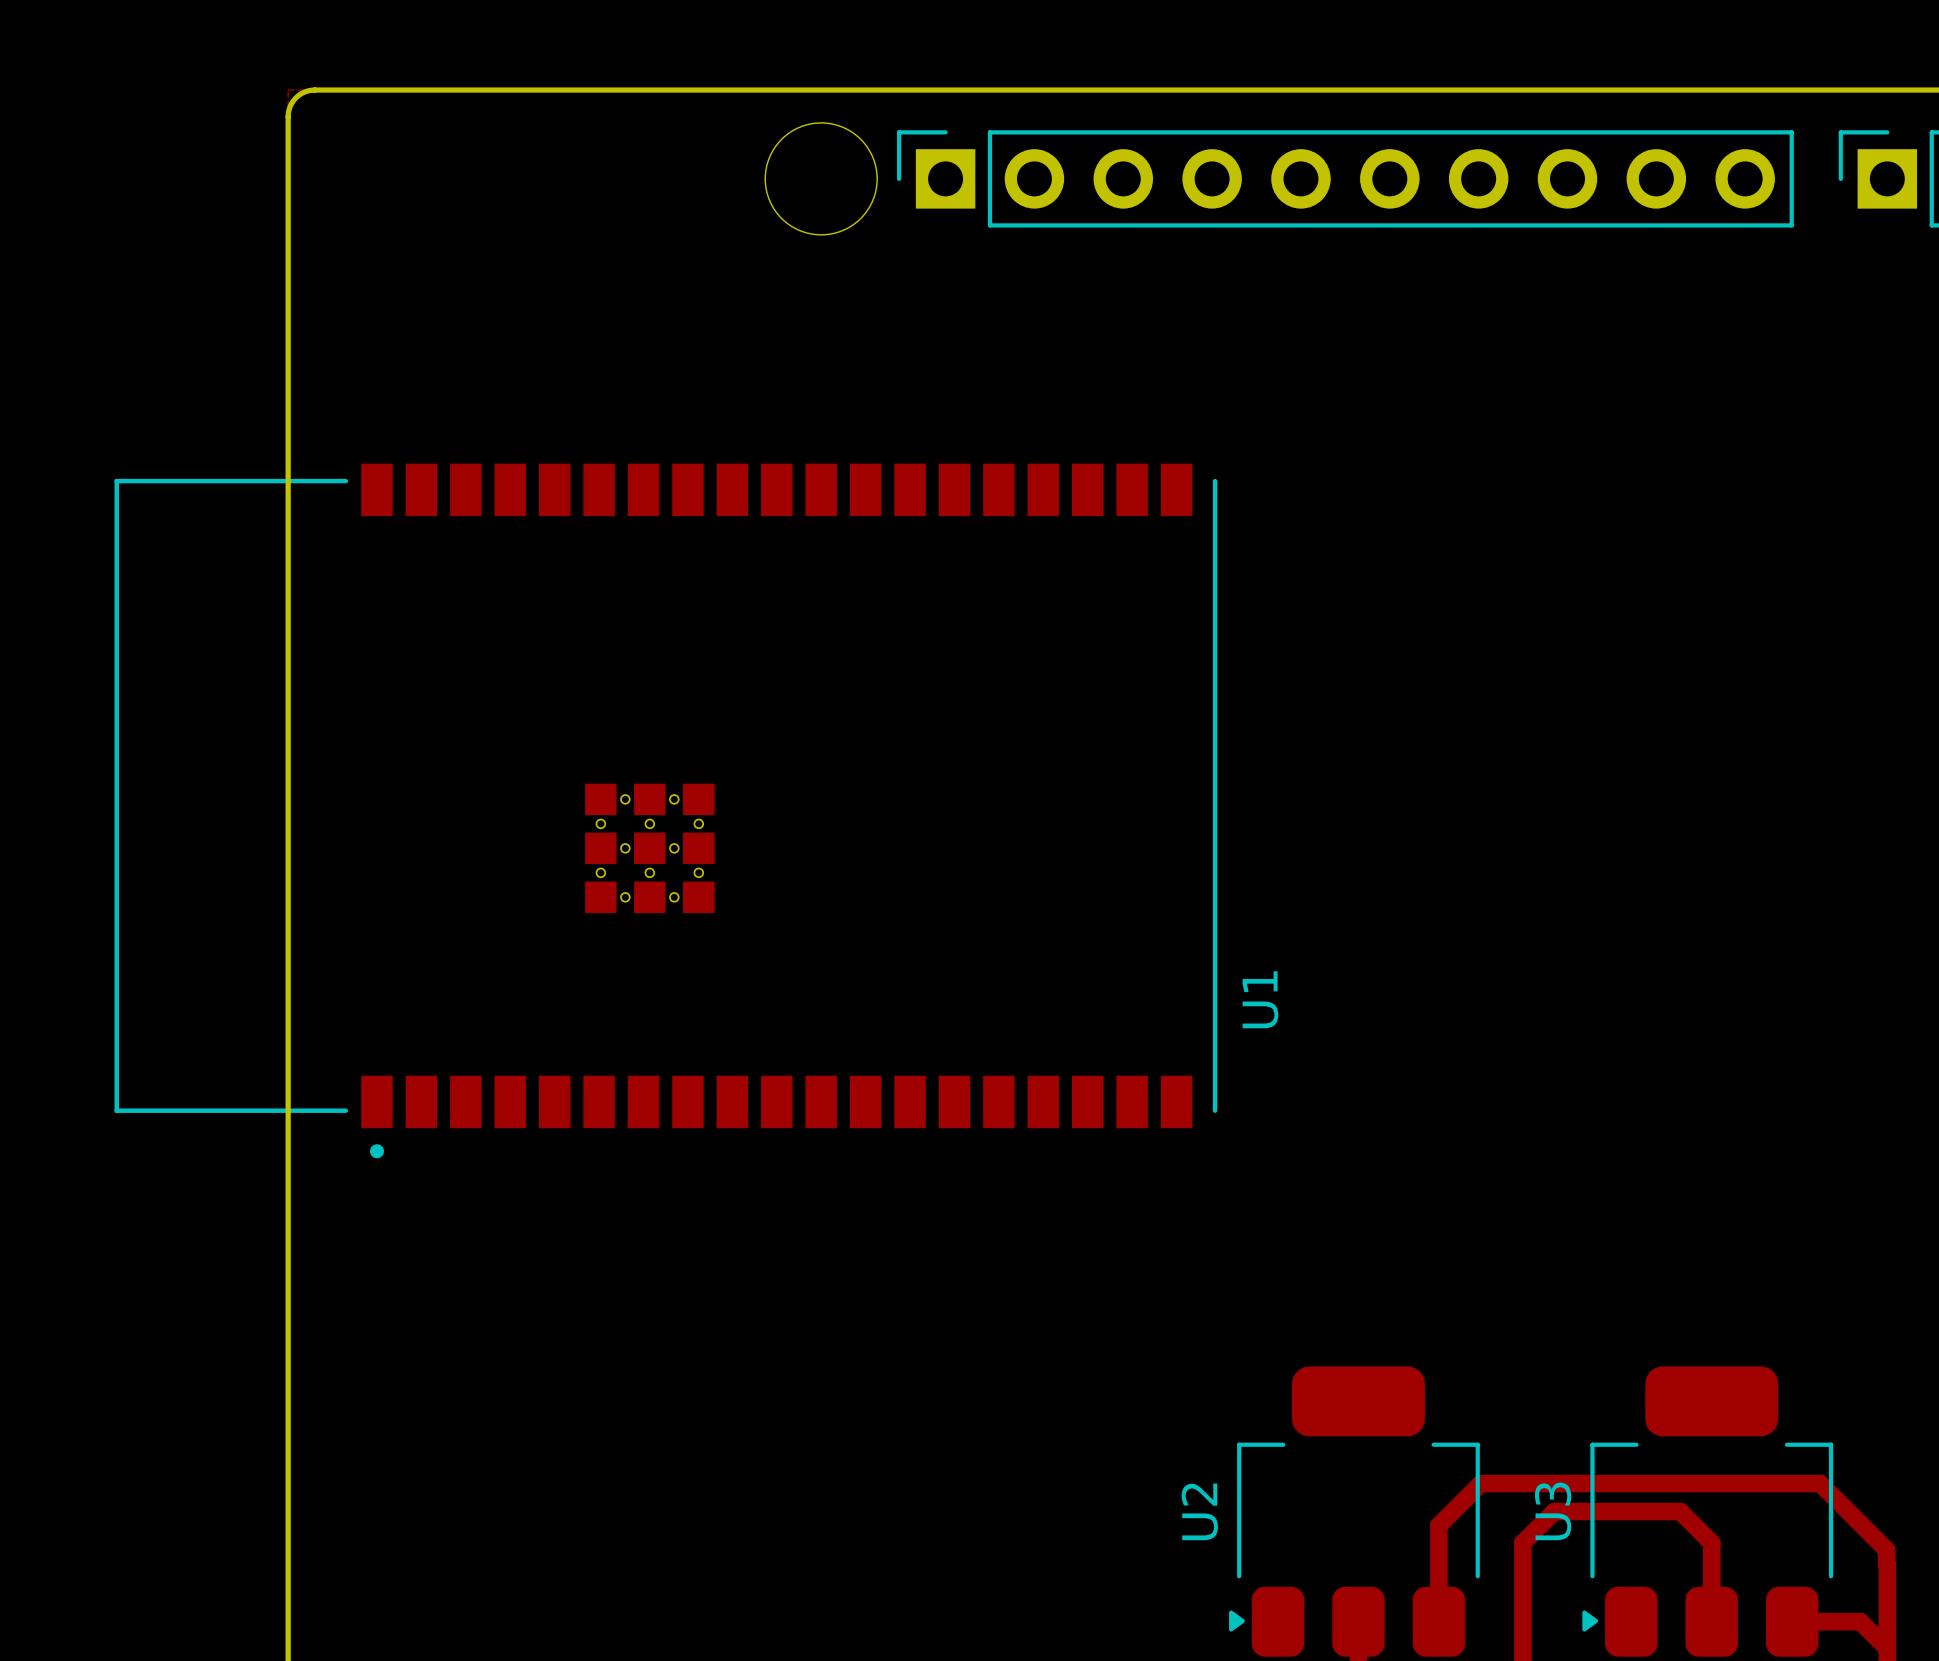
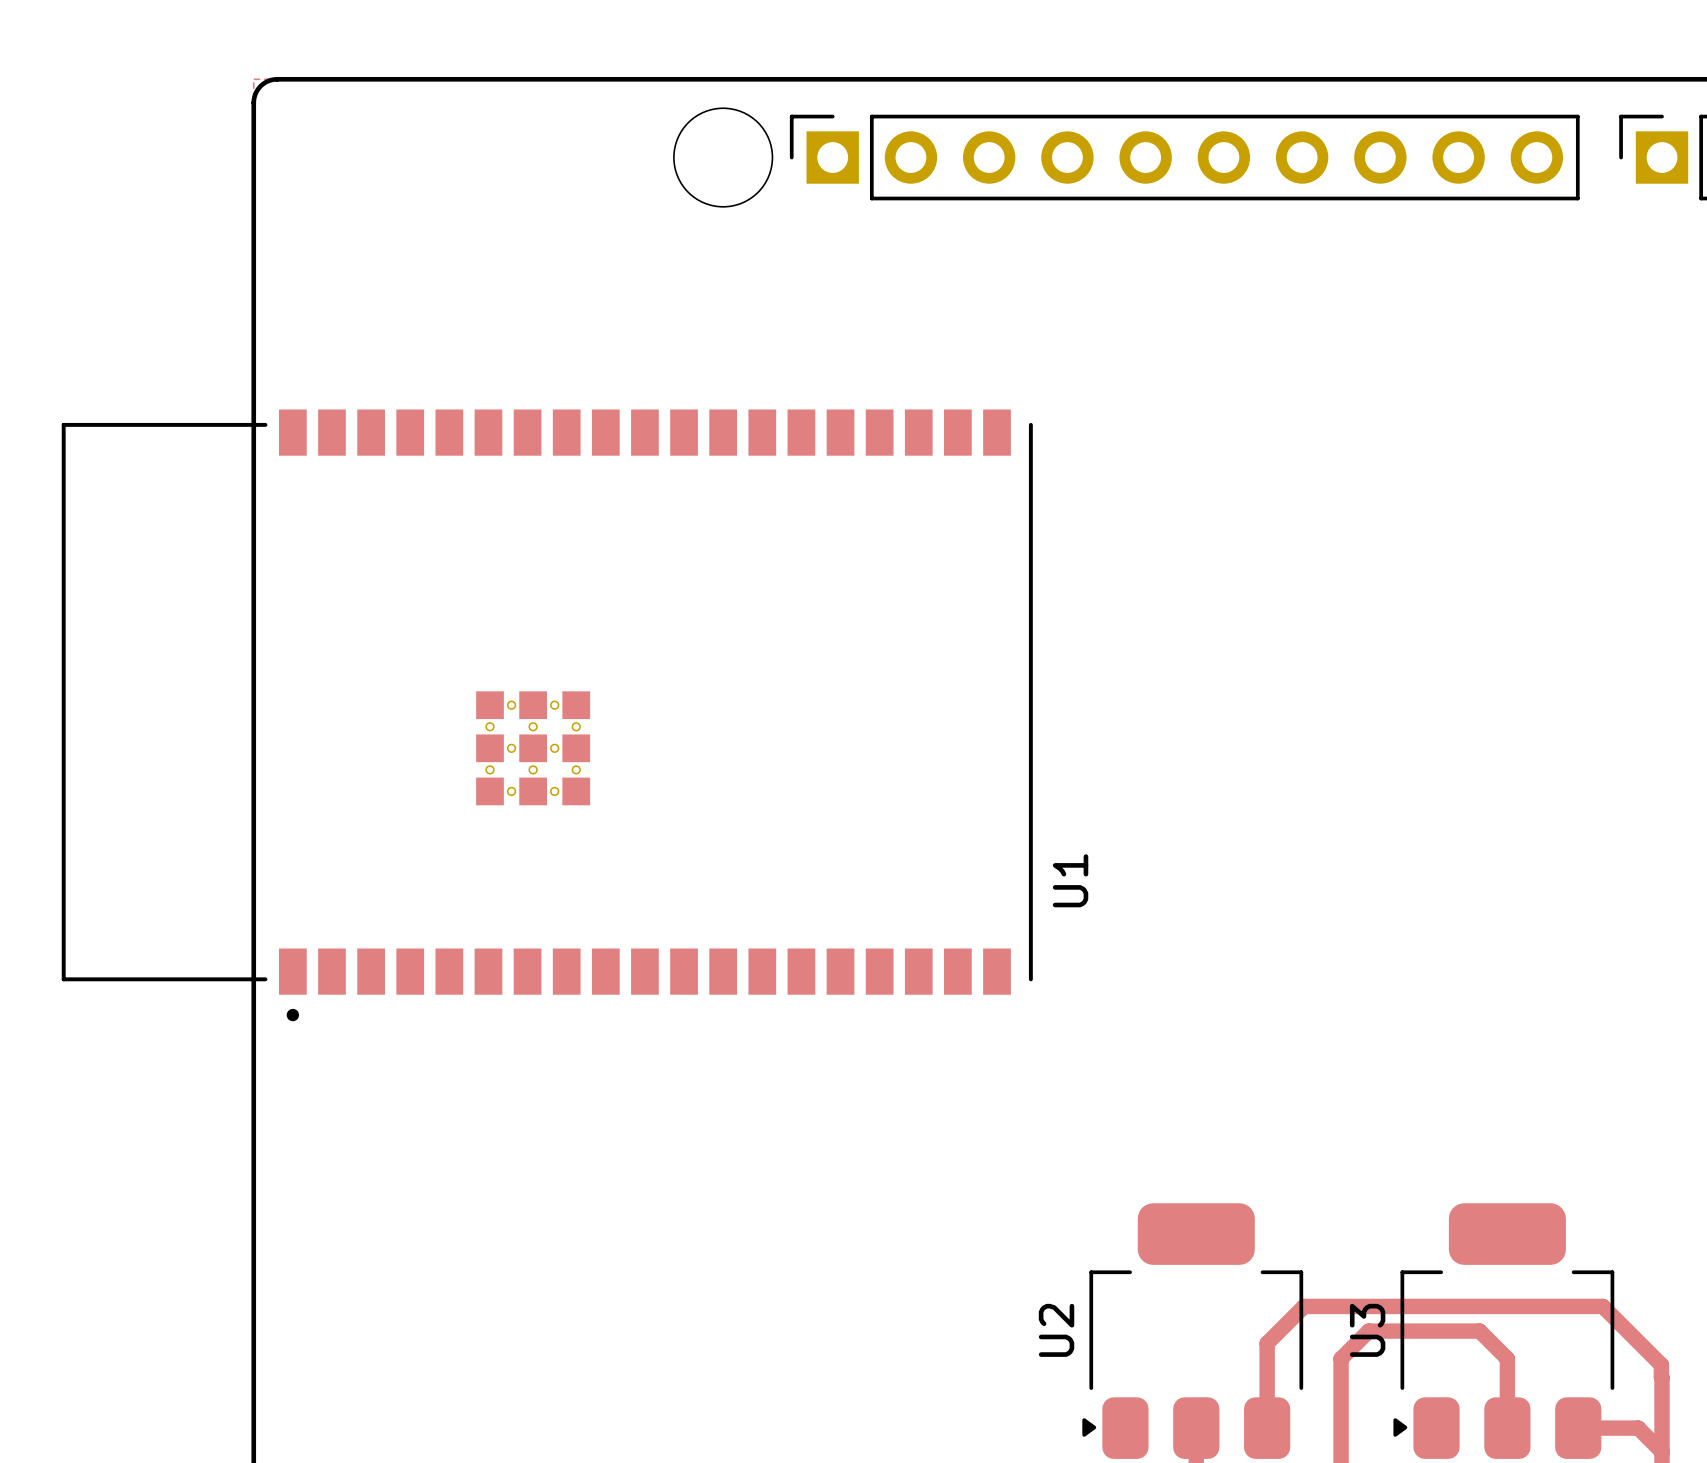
U1 position: (665, 810) -> (547, 715)

